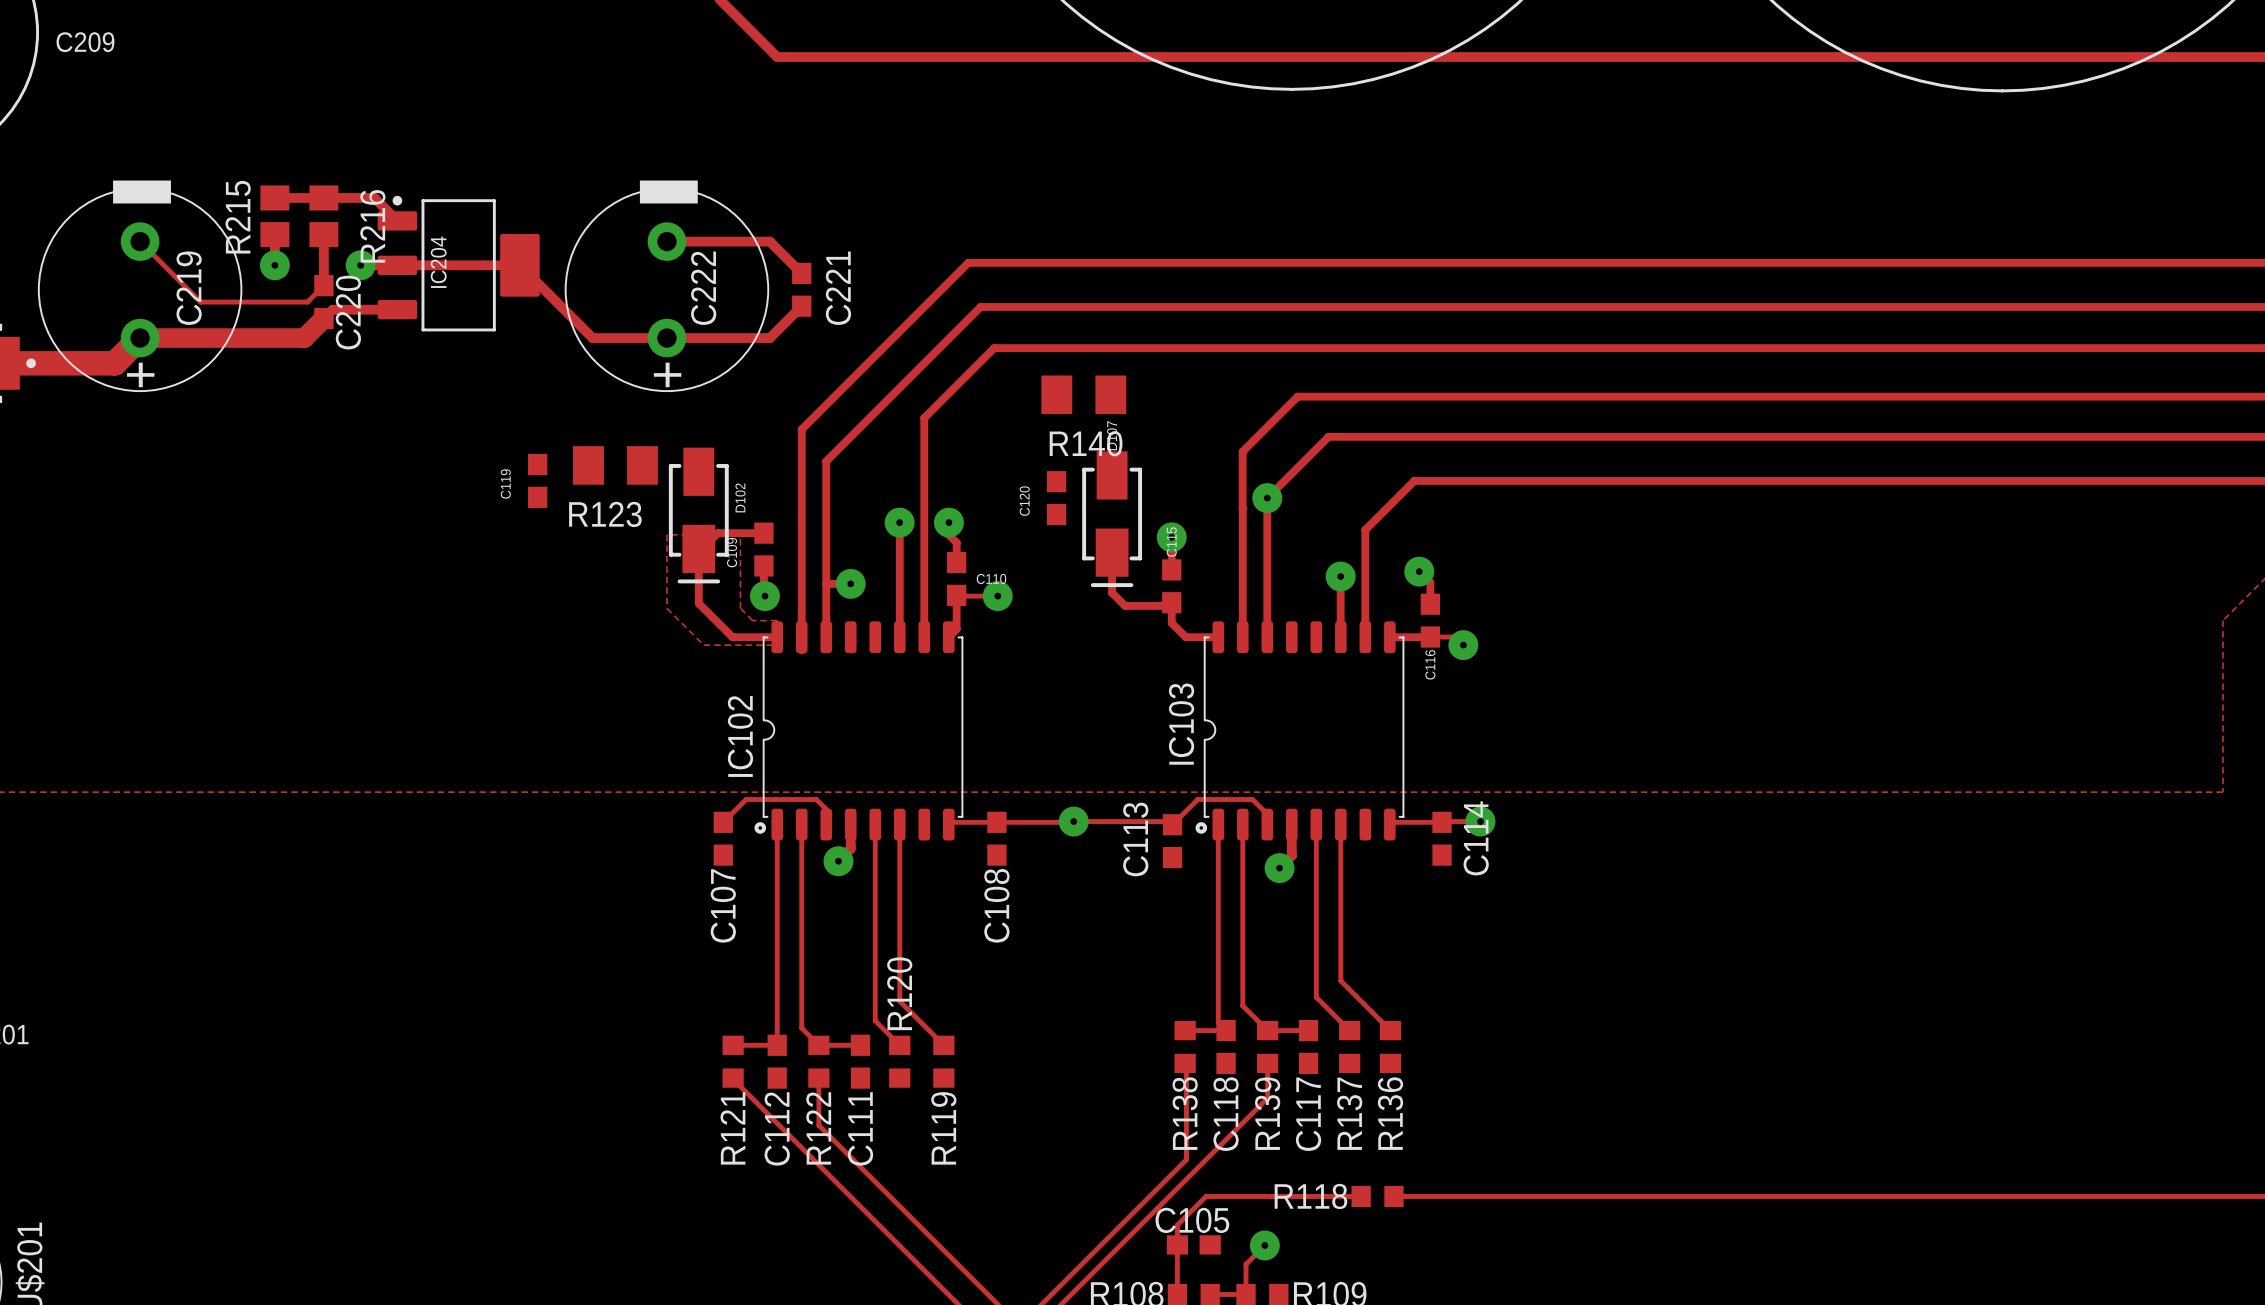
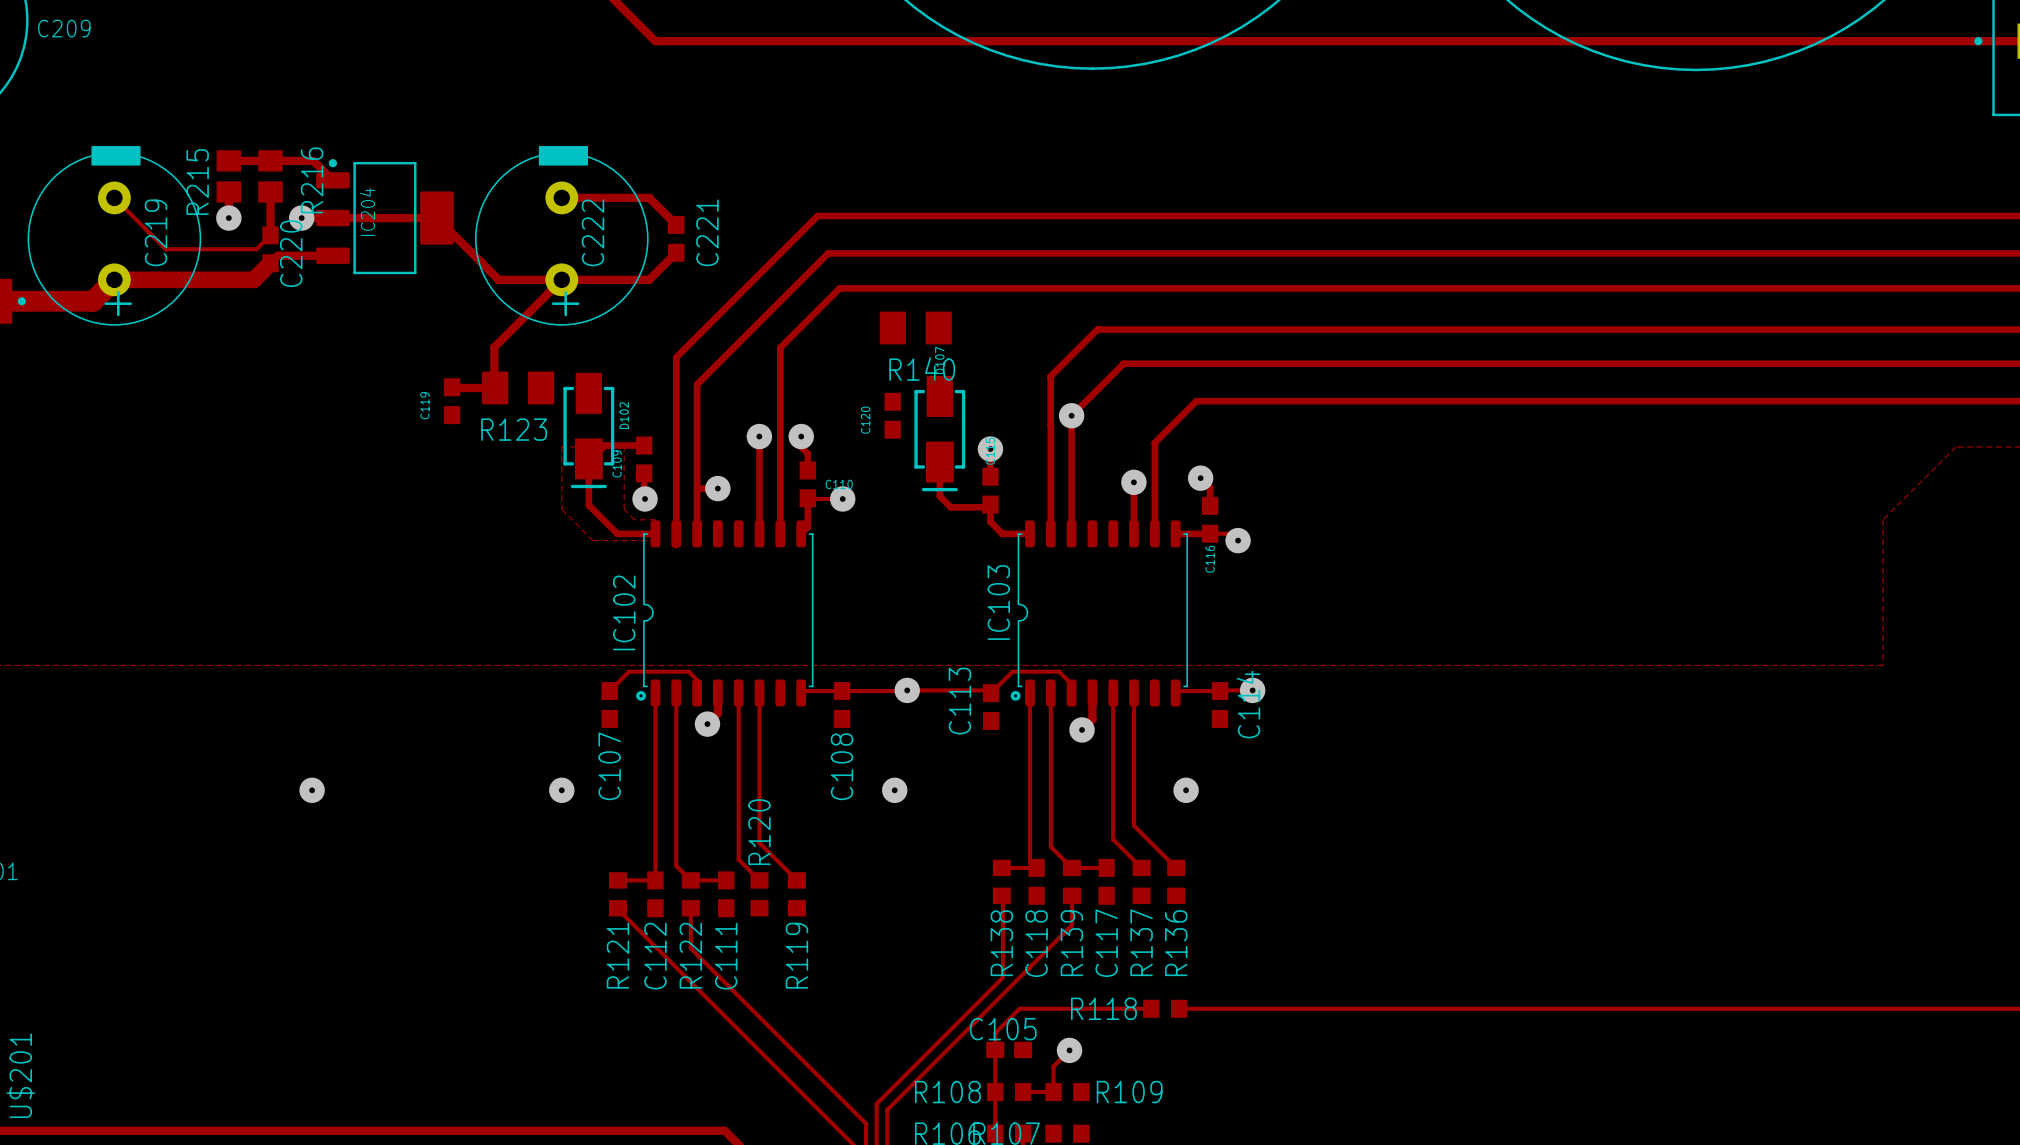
track: none -> (561, 279) (494, 347) (494, 387)
track: none -> (452, 387) (495, 387)
via: none -> (312, 790)
via: none -> (561, 790)
via: none -> (894, 790)
via: none -> (1186, 790)

